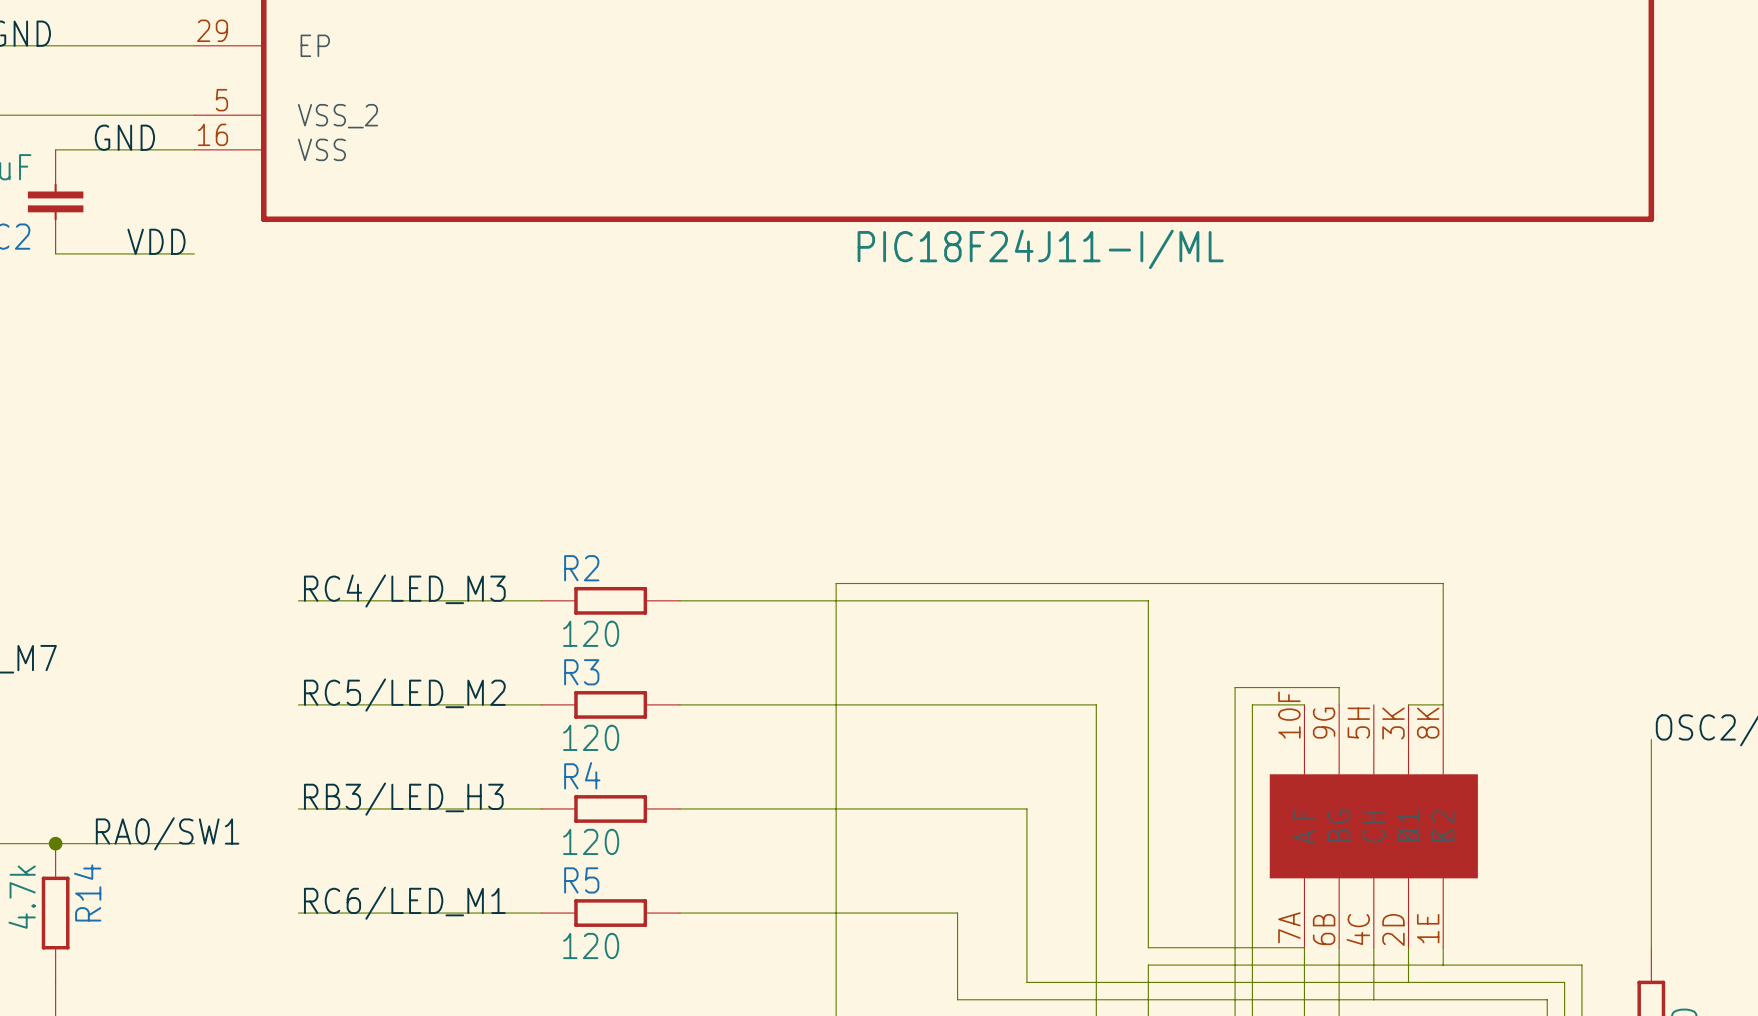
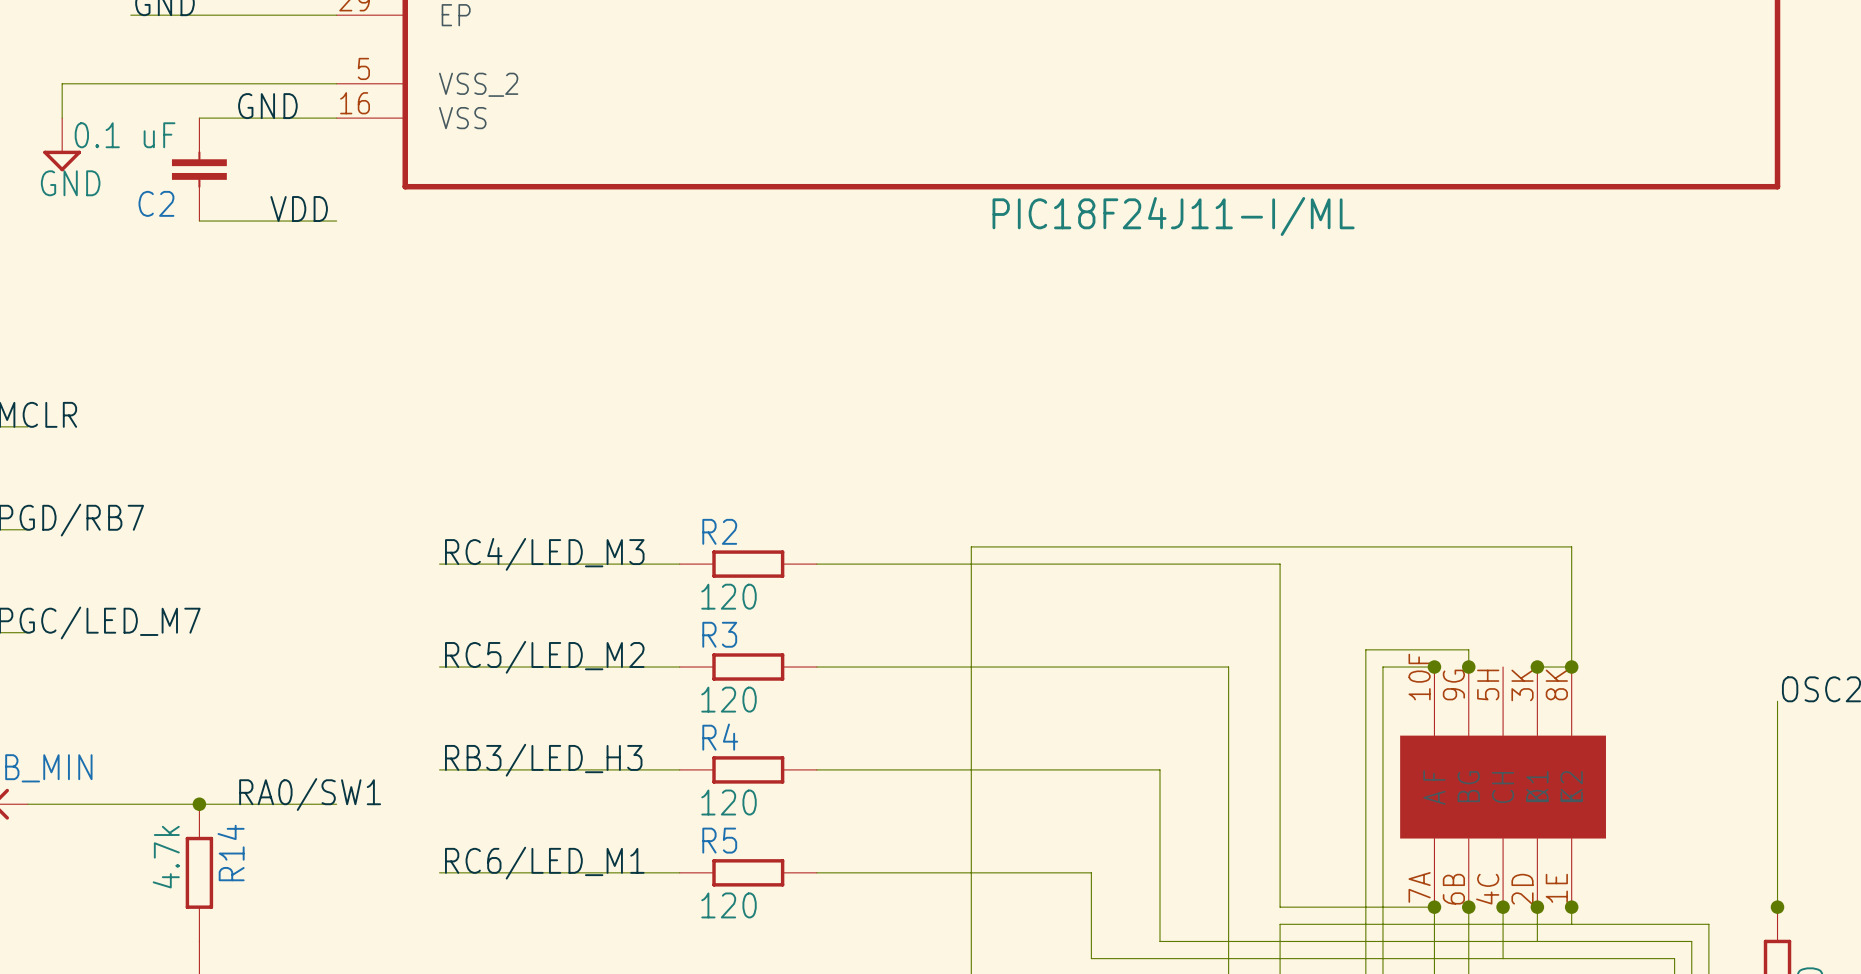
junction: none -> (1434, 667)
junction: none -> (1468, 667)
junction: none -> (1537, 667)
junction: none -> (1571, 667)
junction: none -> (1434, 907)
junction: none -> (1468, 907)
junction: none -> (1503, 907)
junction: none -> (1537, 907)
junction: none -> (1571, 907)
junction: none -> (1777, 907)

